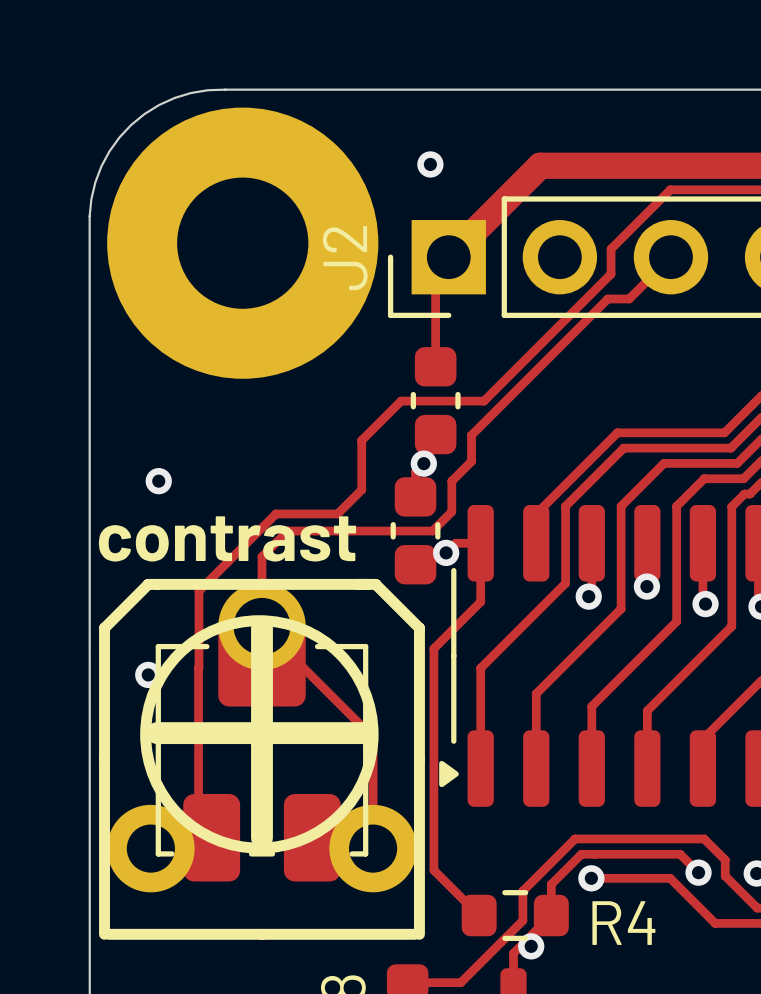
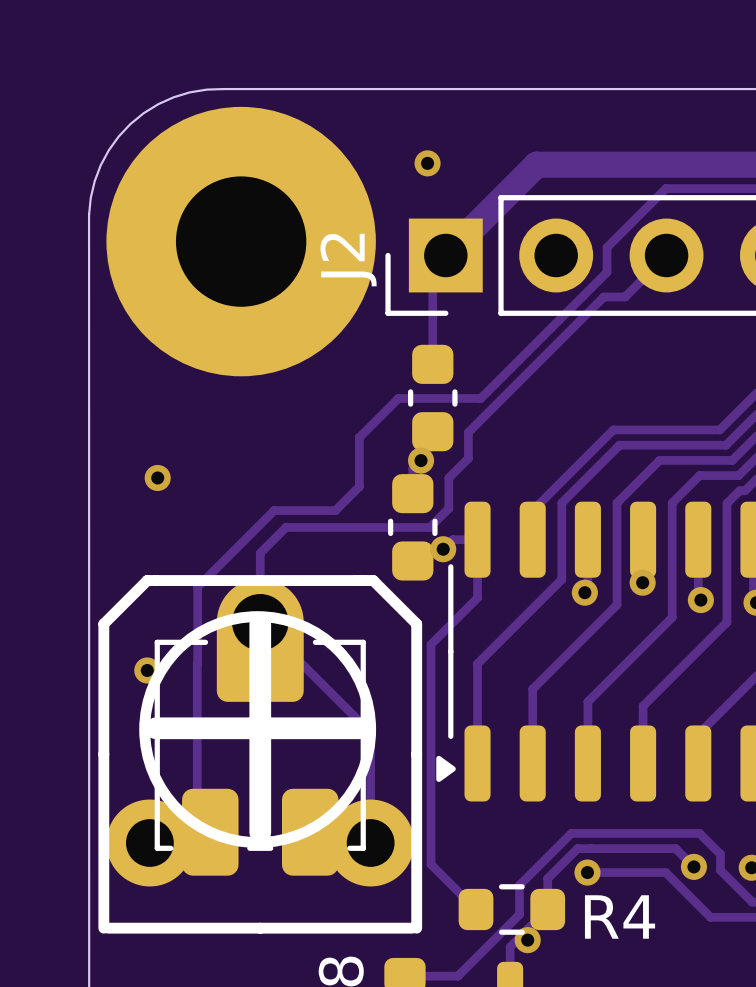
text: contrast (227, 538) -> none

